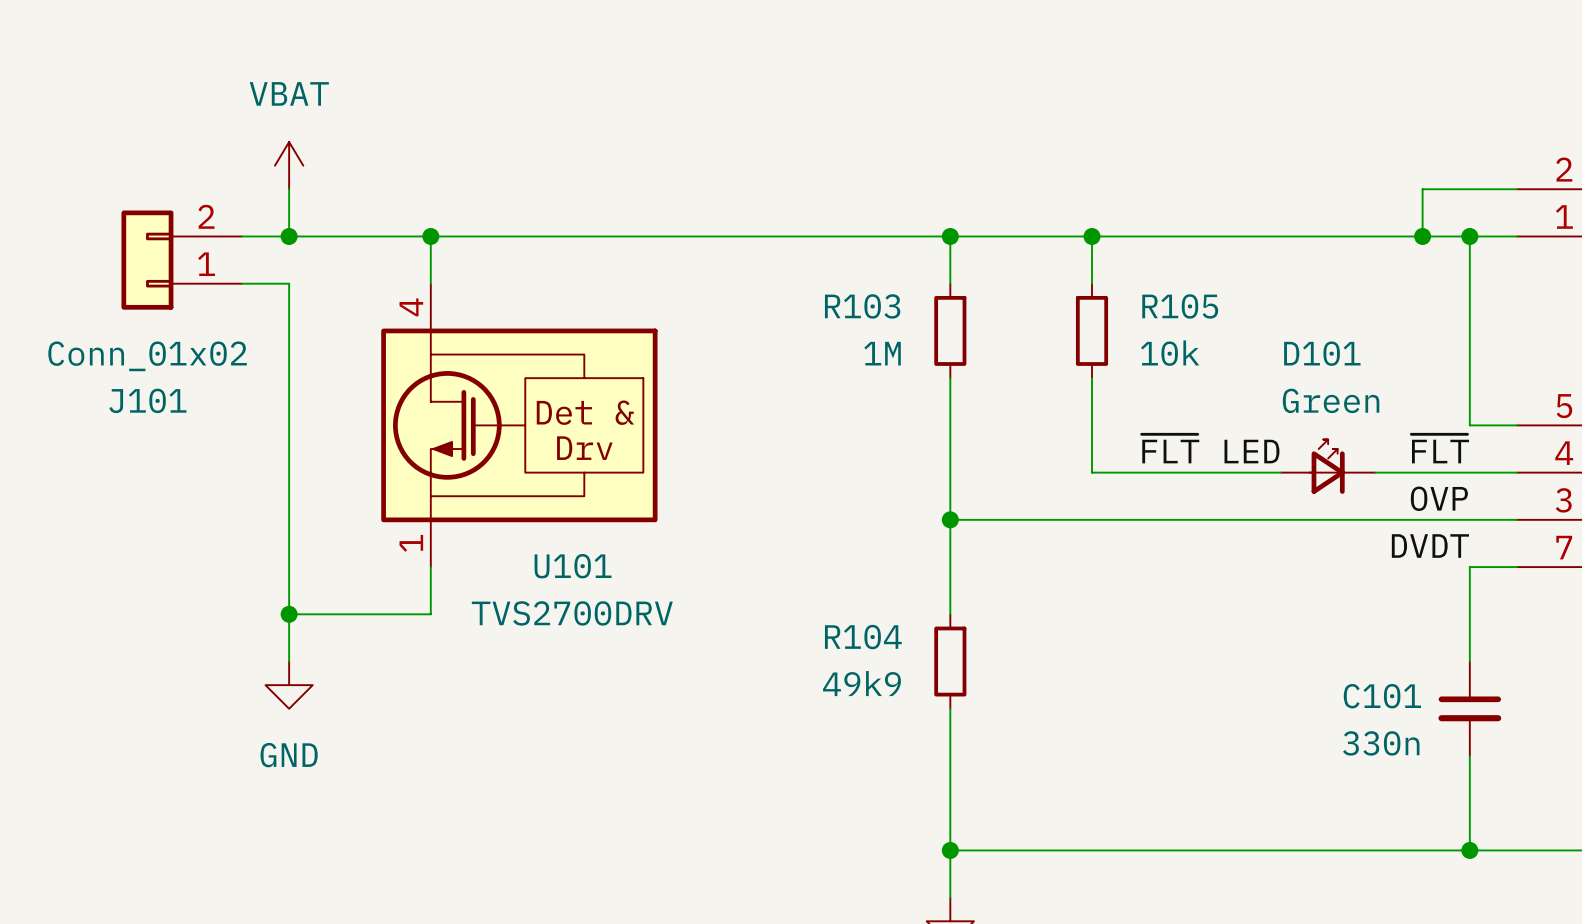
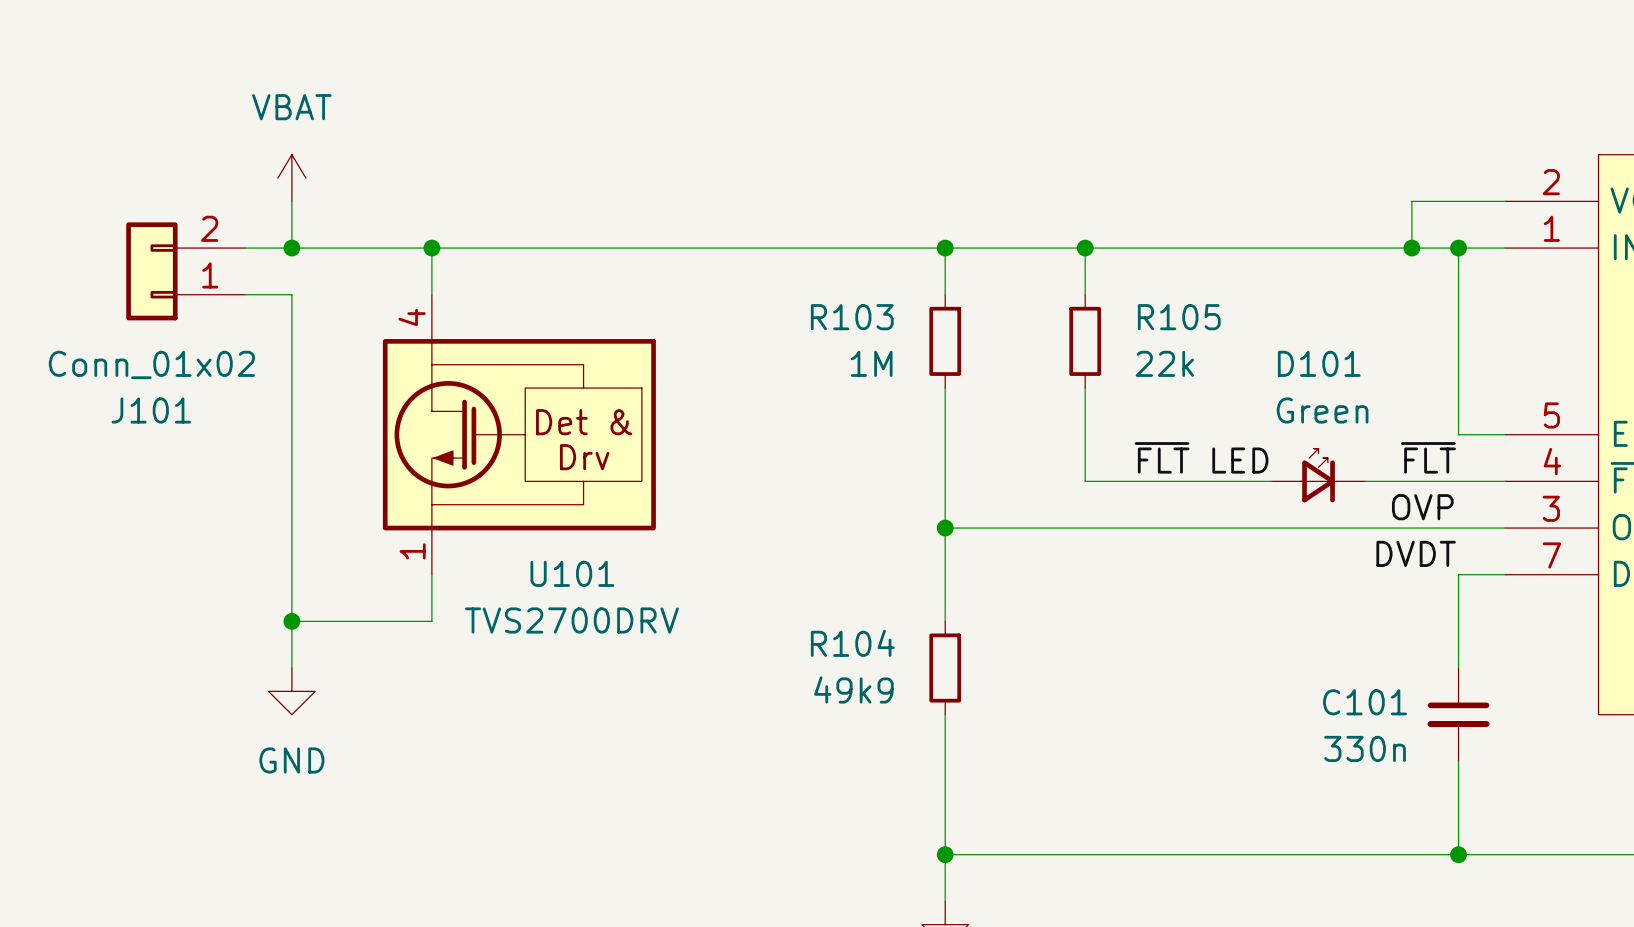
R105 value: 10k (1170, 353) -> 22k (1164, 363)

